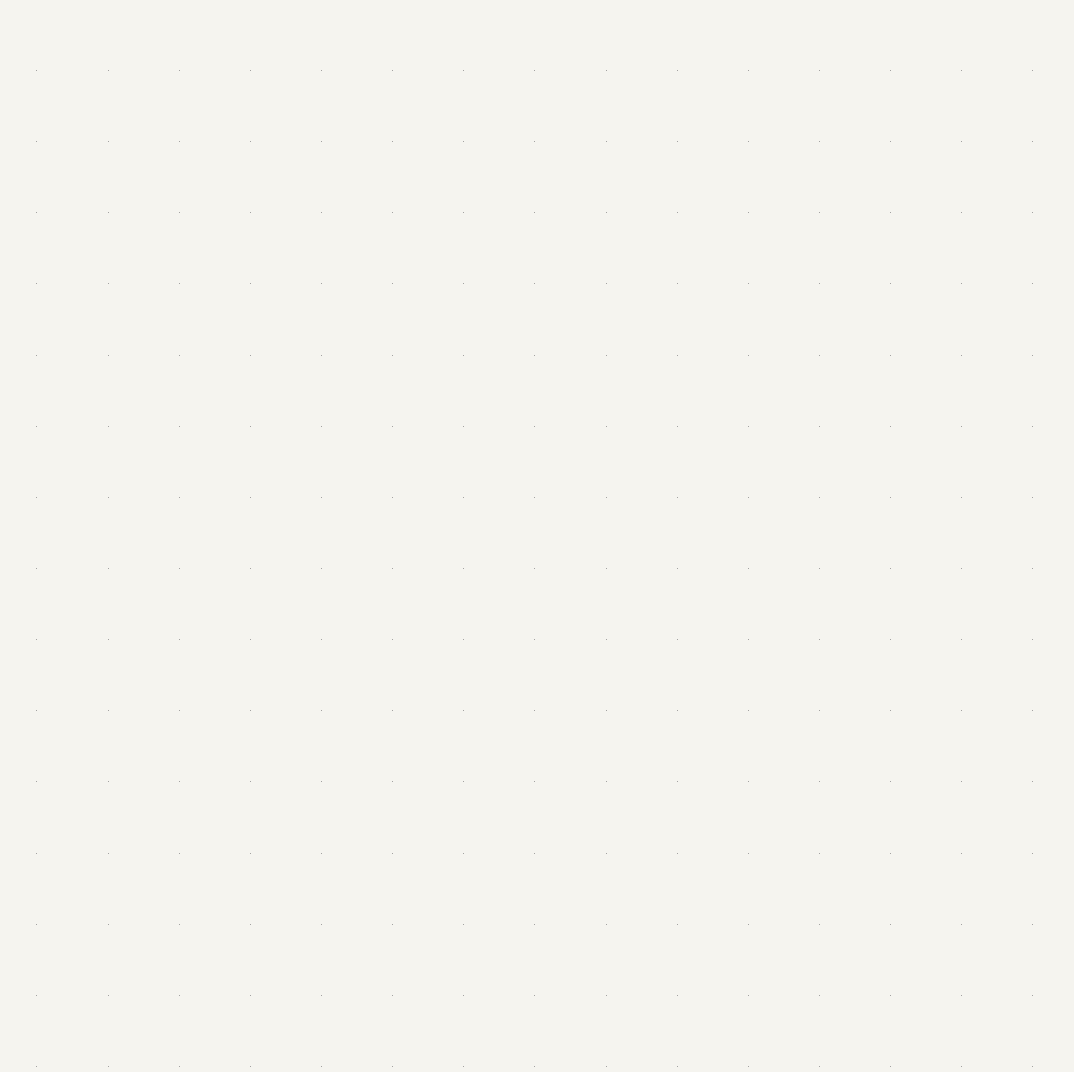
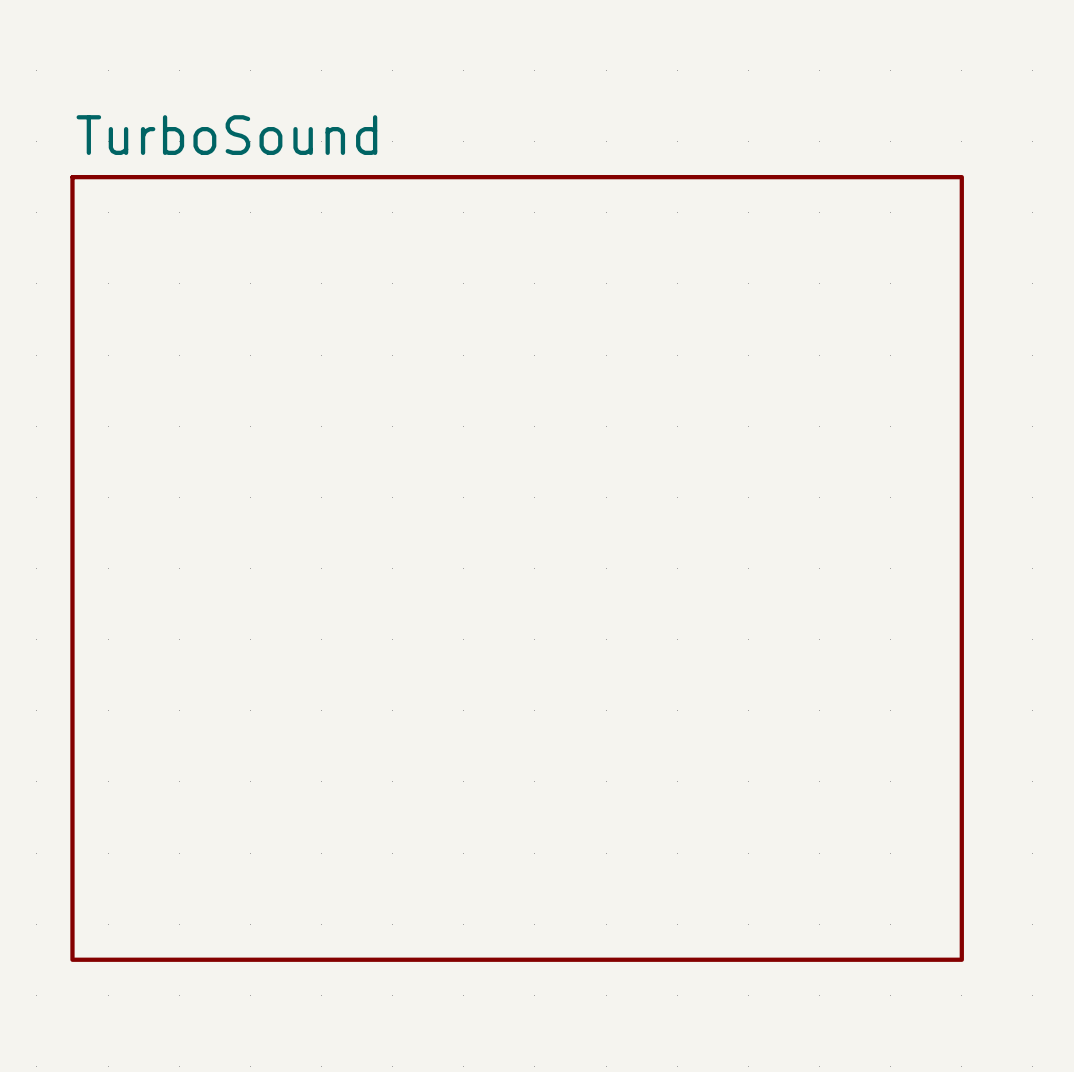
sheet TurboSound: none -> (517, 568)

